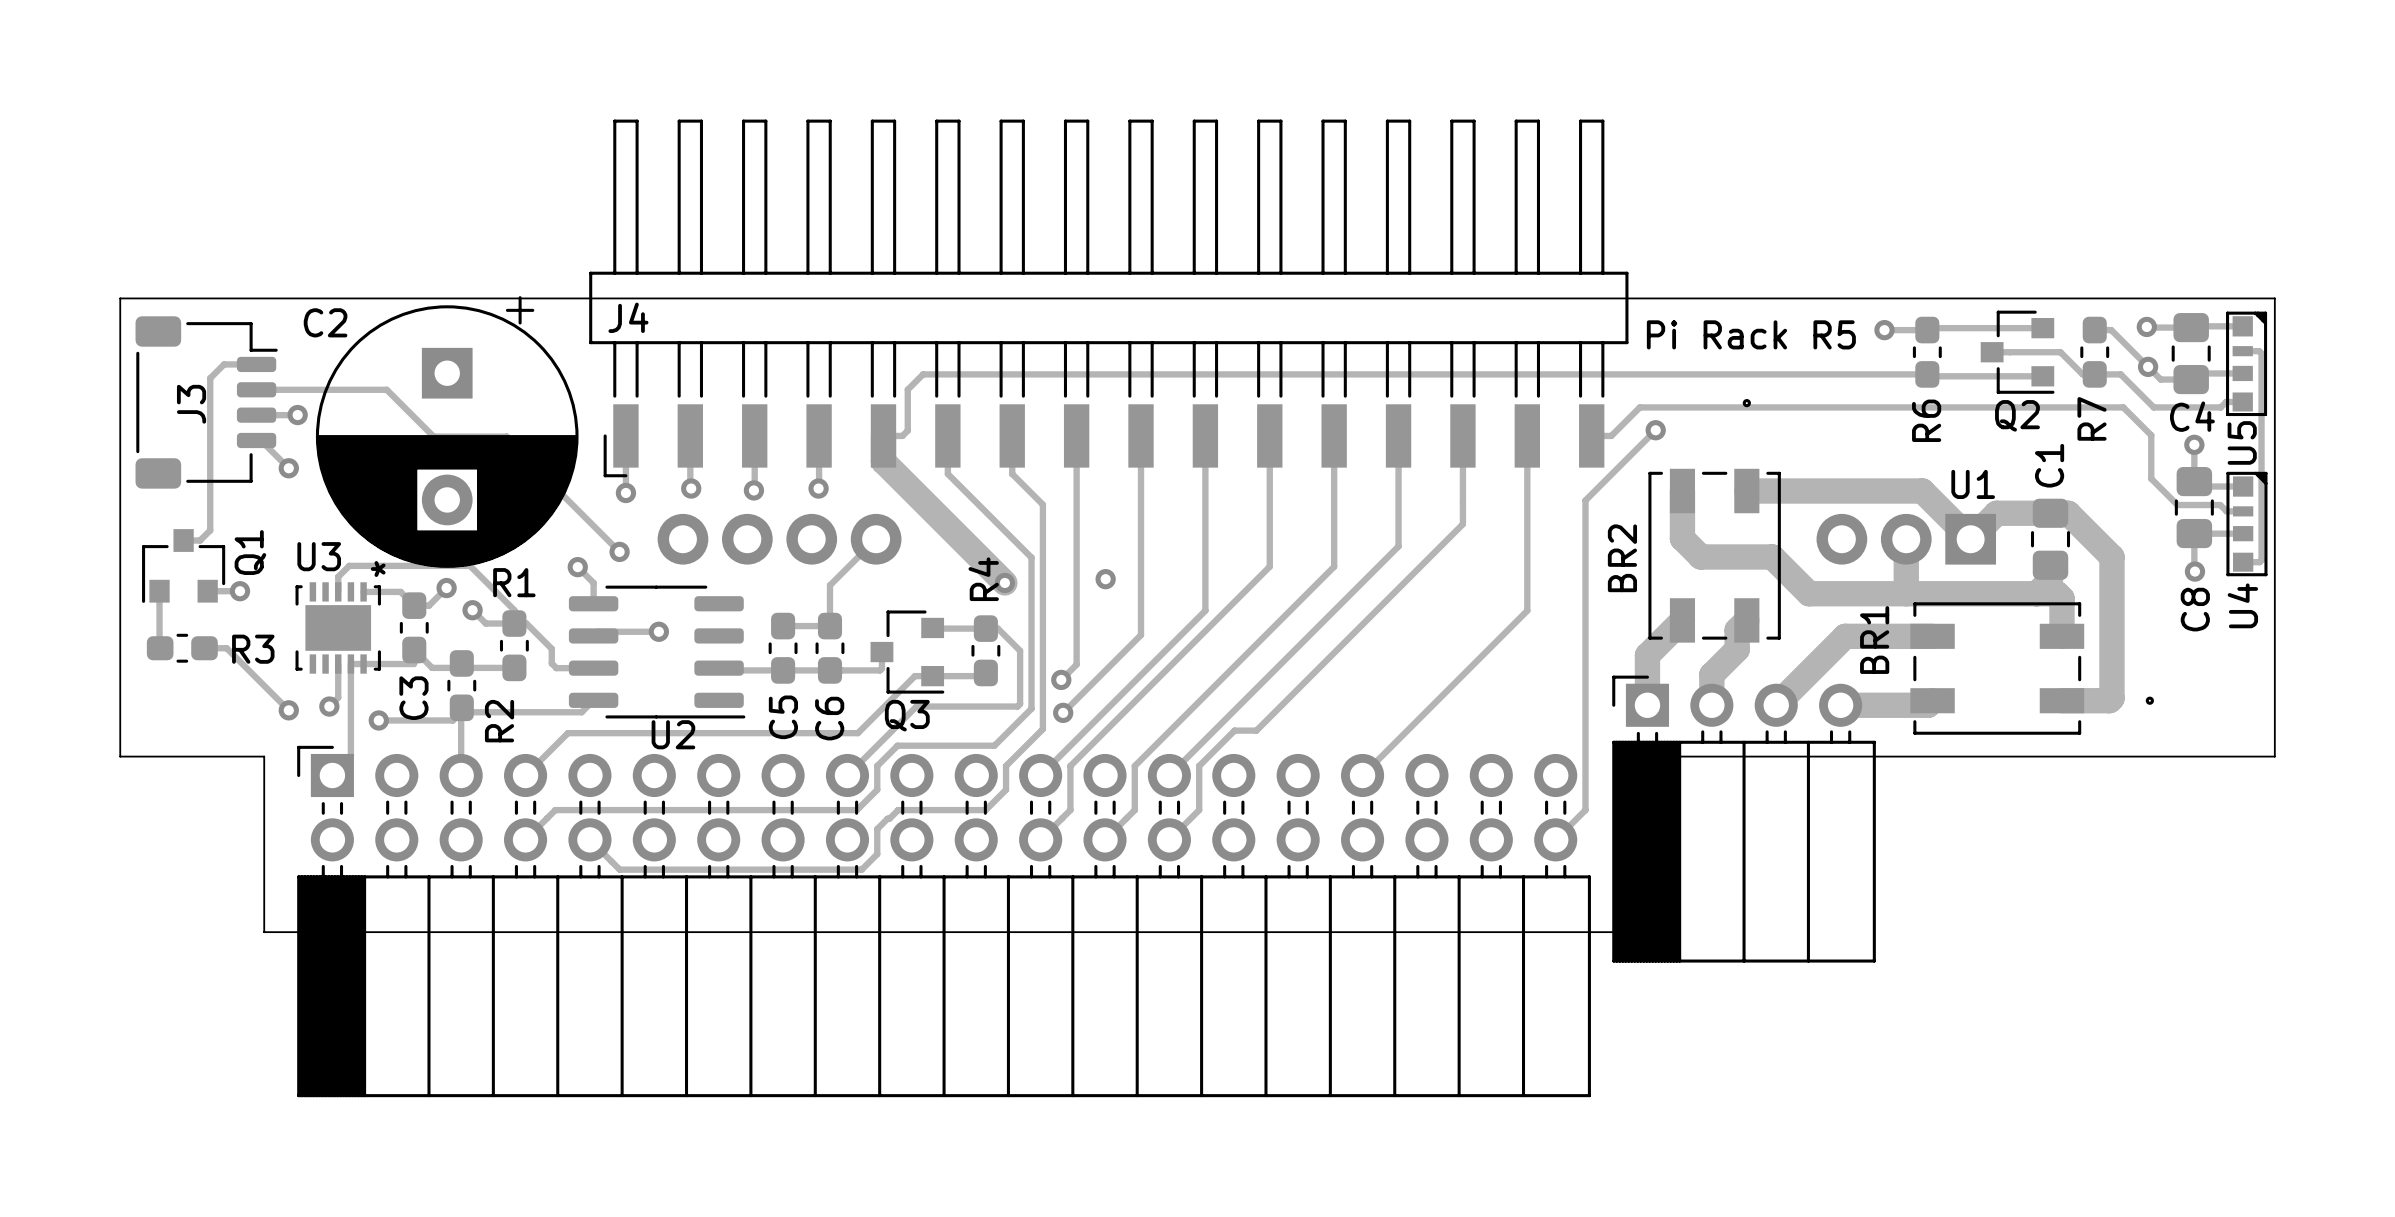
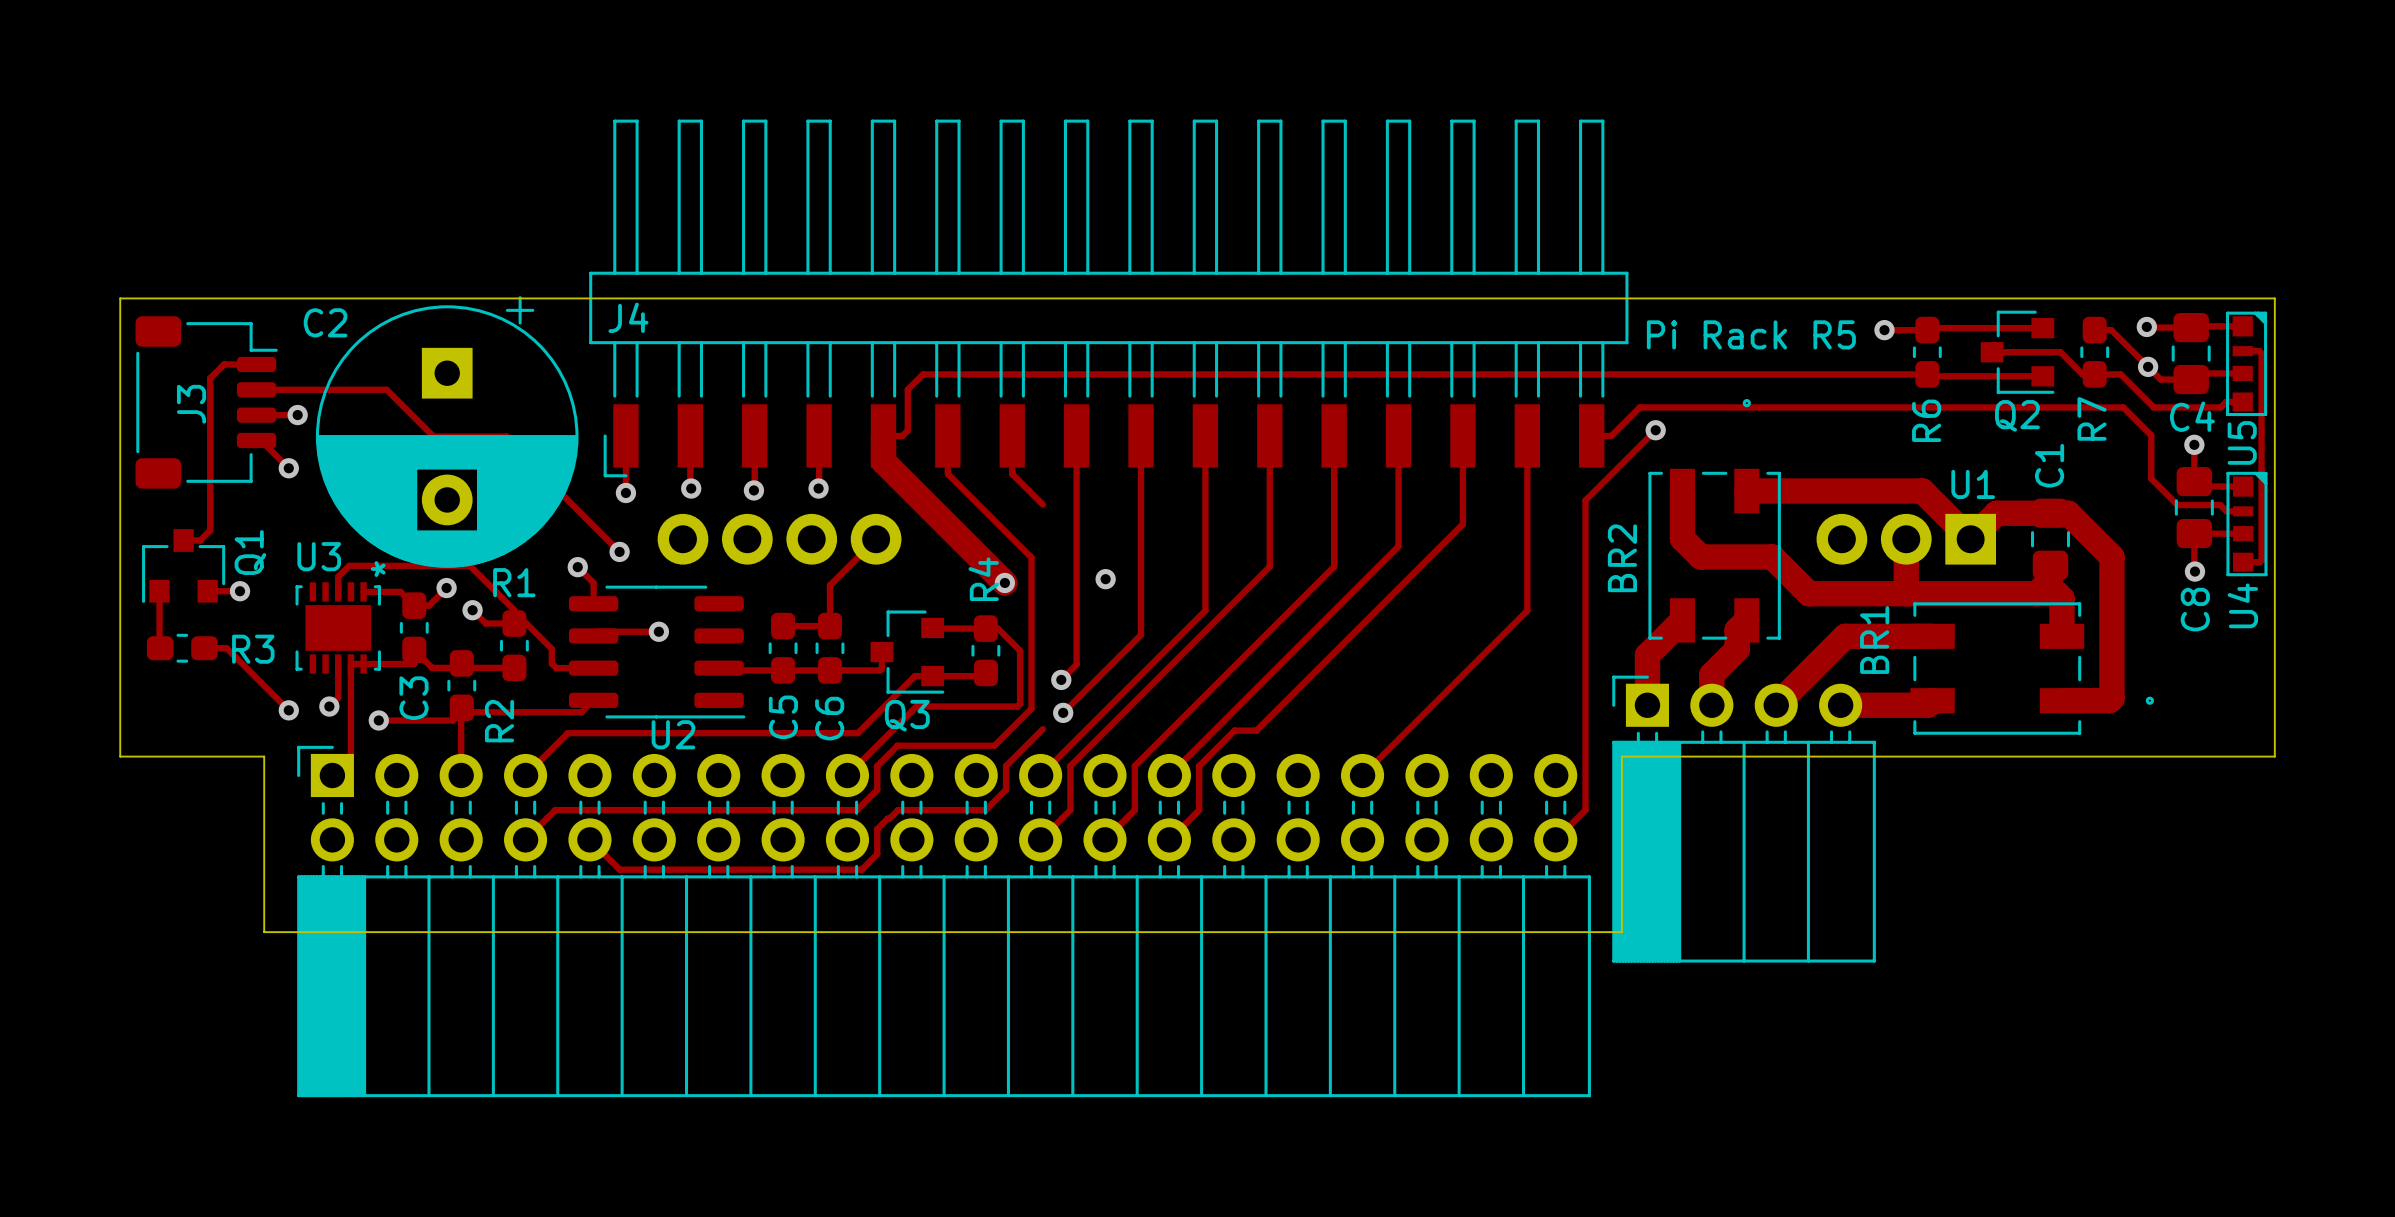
track: (1042, 504) (1042, 729) -> none

